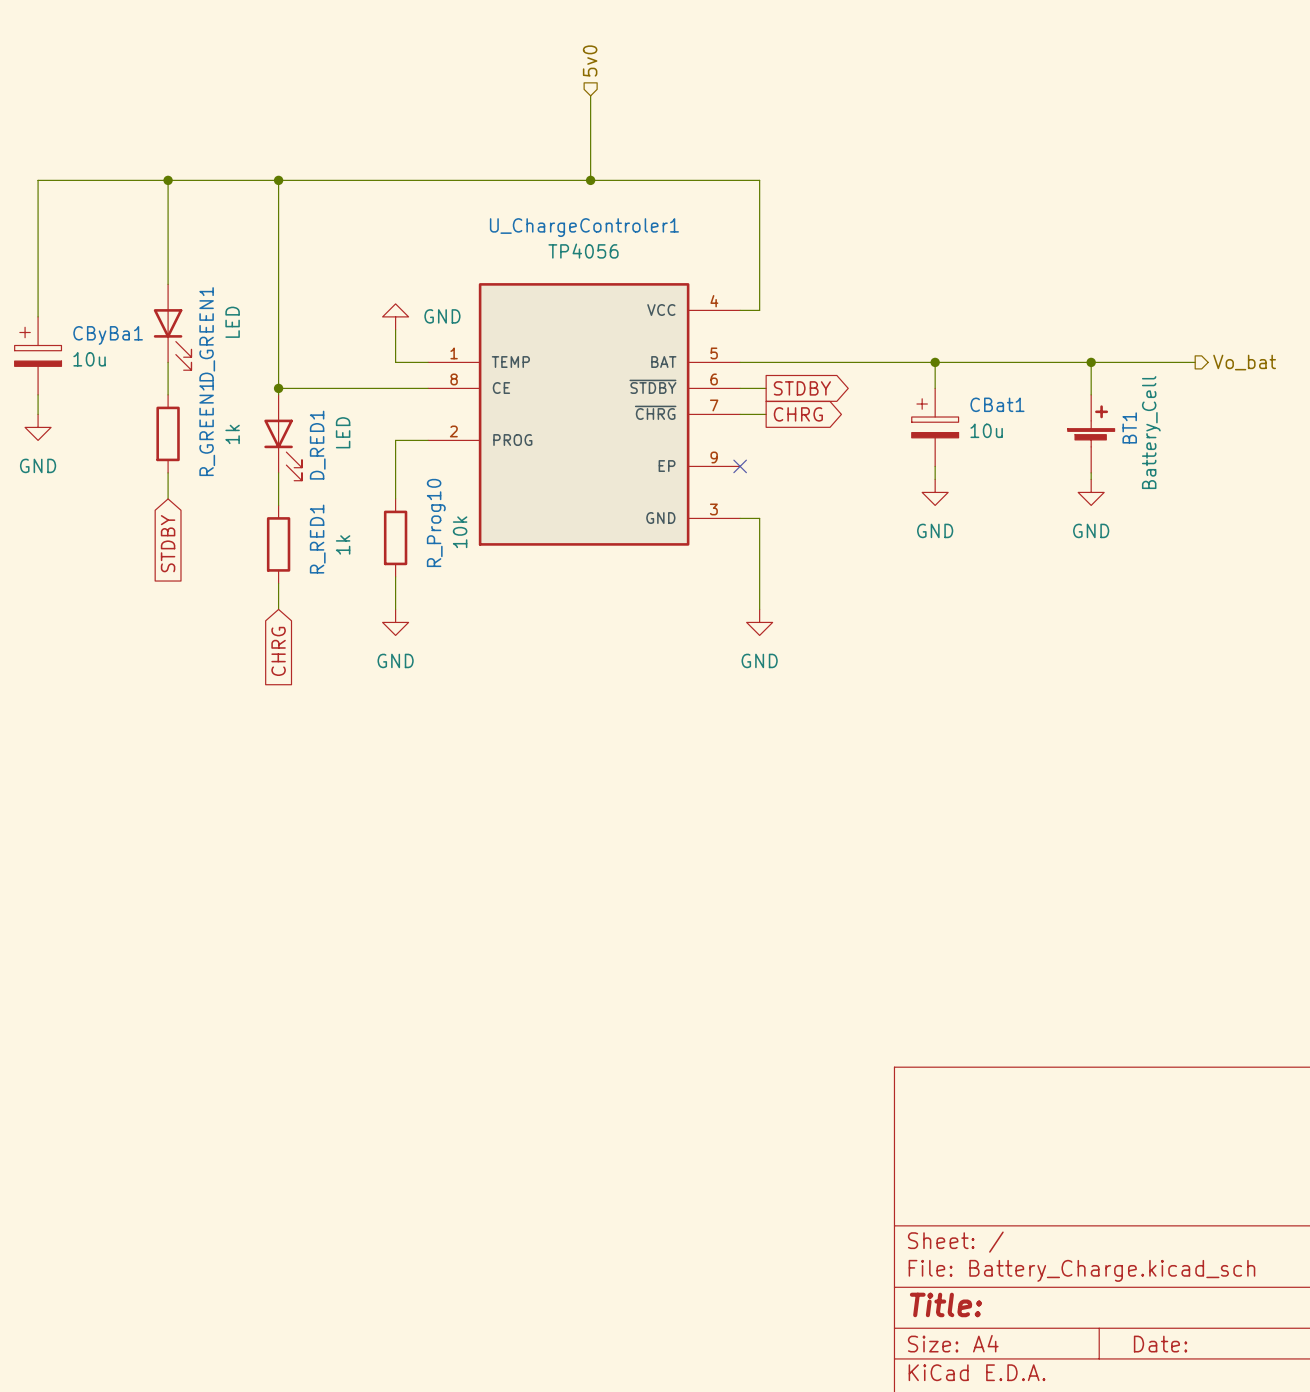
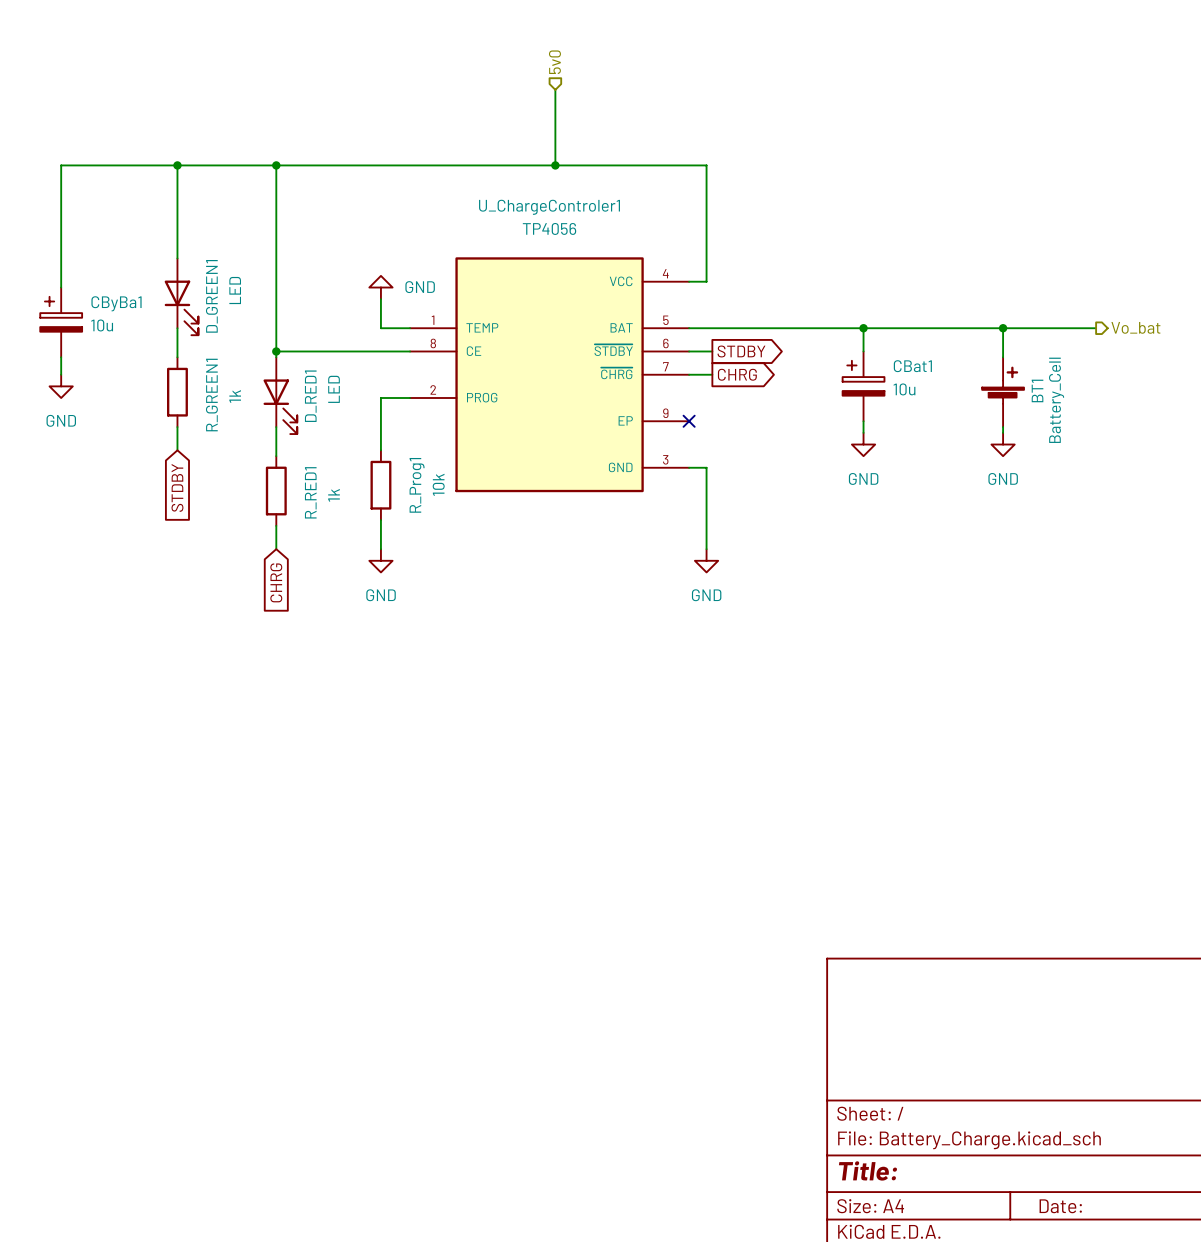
R_Prog10 name: R_Prog10 (436, 522) -> R_Prog1 (417, 485)

